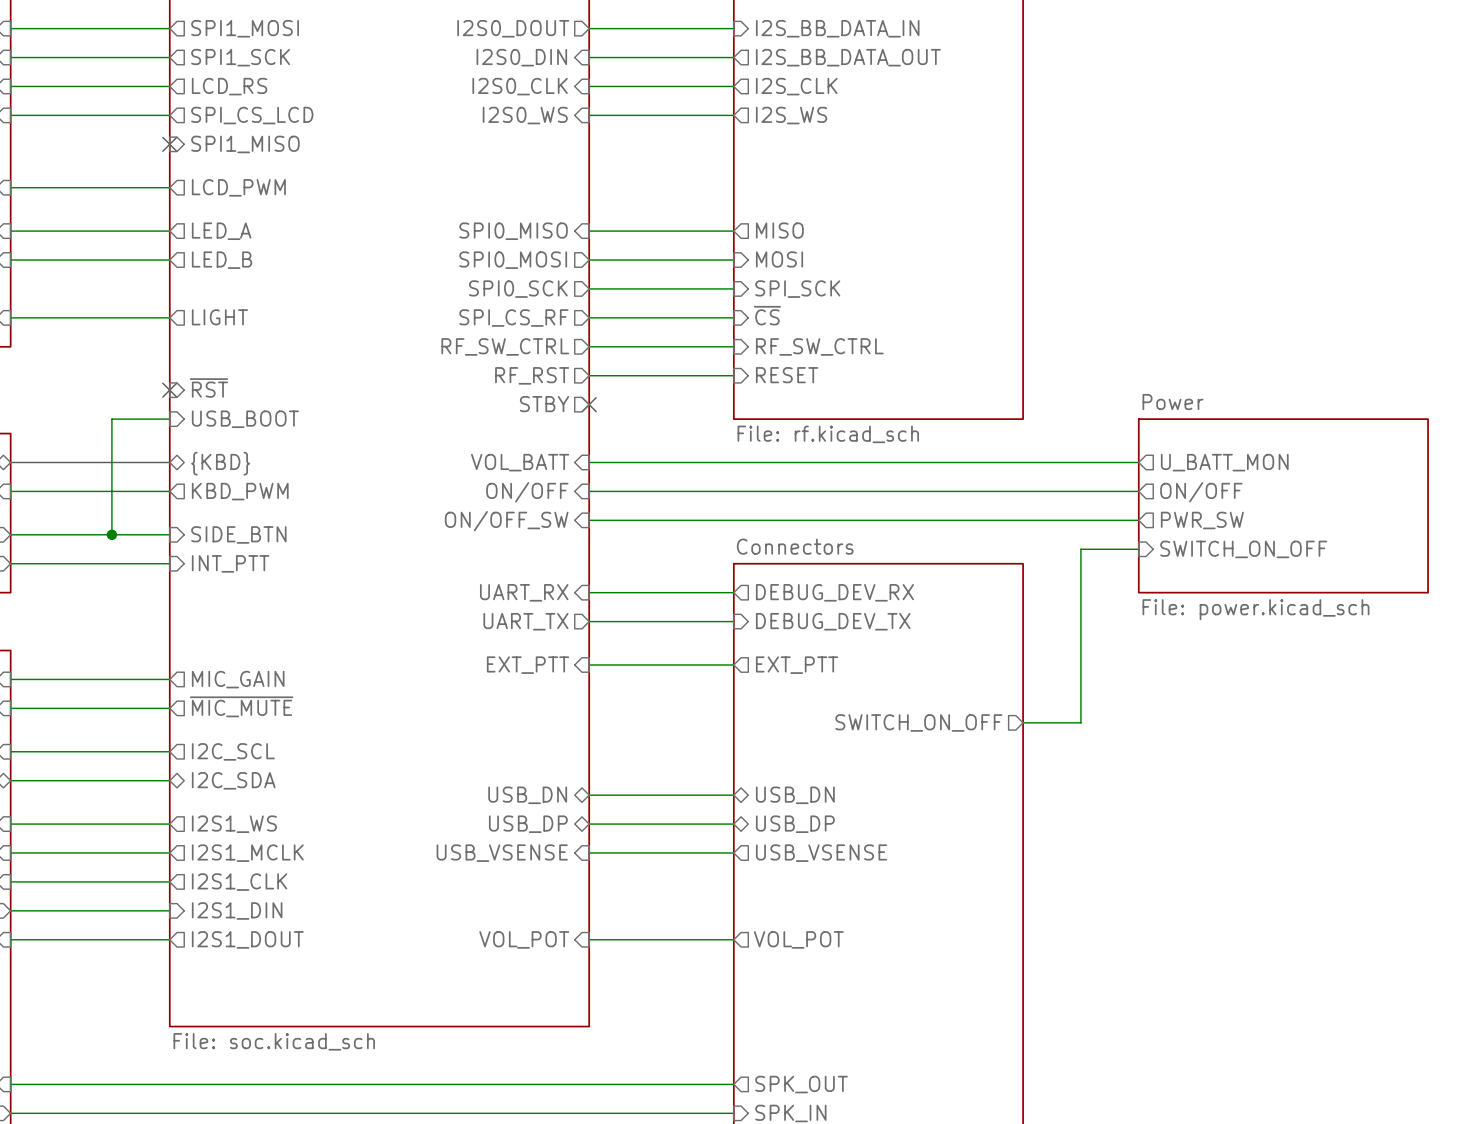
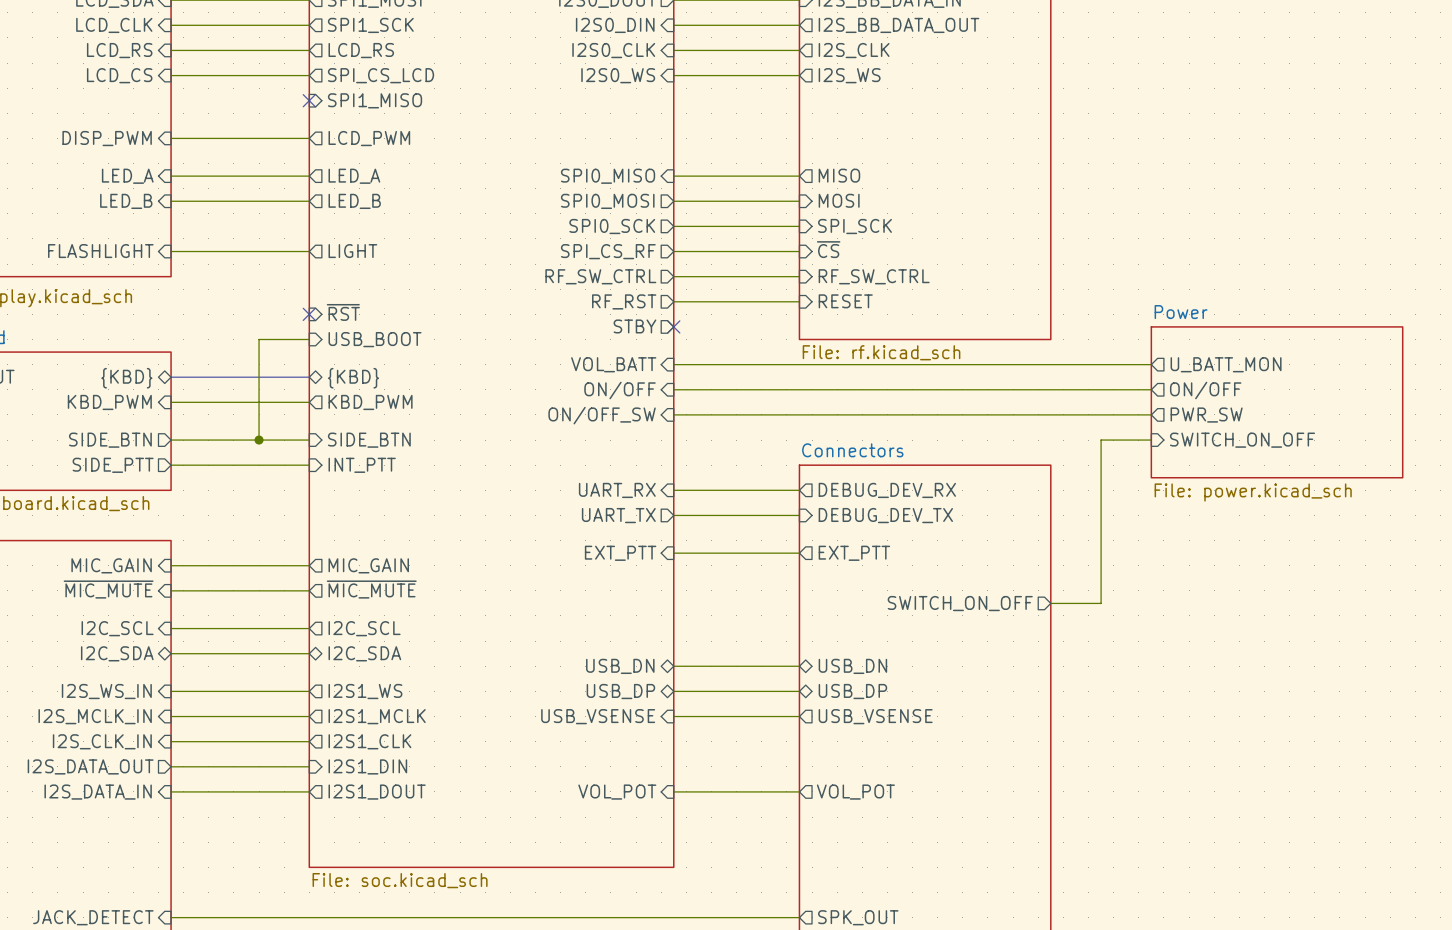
sheet pin position: VOL_BATT (520, 462) -> VOL_BATT (613, 364)
wire: (589, 462) (1138, 462) -> (673, 364) (1151, 364)
sheet pin position: U_BATT_MON (1224, 462) -> U_BATT_MON (1226, 364)
wire: (589, 491) (1138, 491) -> (673, 389) (1151, 389)
sheet pin position: ON/OFF (527, 492) -> ON/OFF (620, 390)
sheet pin position: ON/OFF (1201, 492) -> ON/OFF (1205, 390)
sheet Power position: (1283, 505) -> (1277, 402)
wire: (589, 520) (1138, 520) -> (673, 414) (1151, 414)
sheet pin position: PWR_SW (1202, 520) -> PWR_SW (1206, 415)
sheet pin position: ON/OFF_SW (506, 521) -> ON/OFF_SW (602, 415)
wire: (1080, 549) (1138, 549) -> (1101, 452) (1101, 440) (1151, 440)
sheet pin position: SWITCH_ON_OFF (1243, 549) -> SWITCH_ON_OFF (1242, 440)

